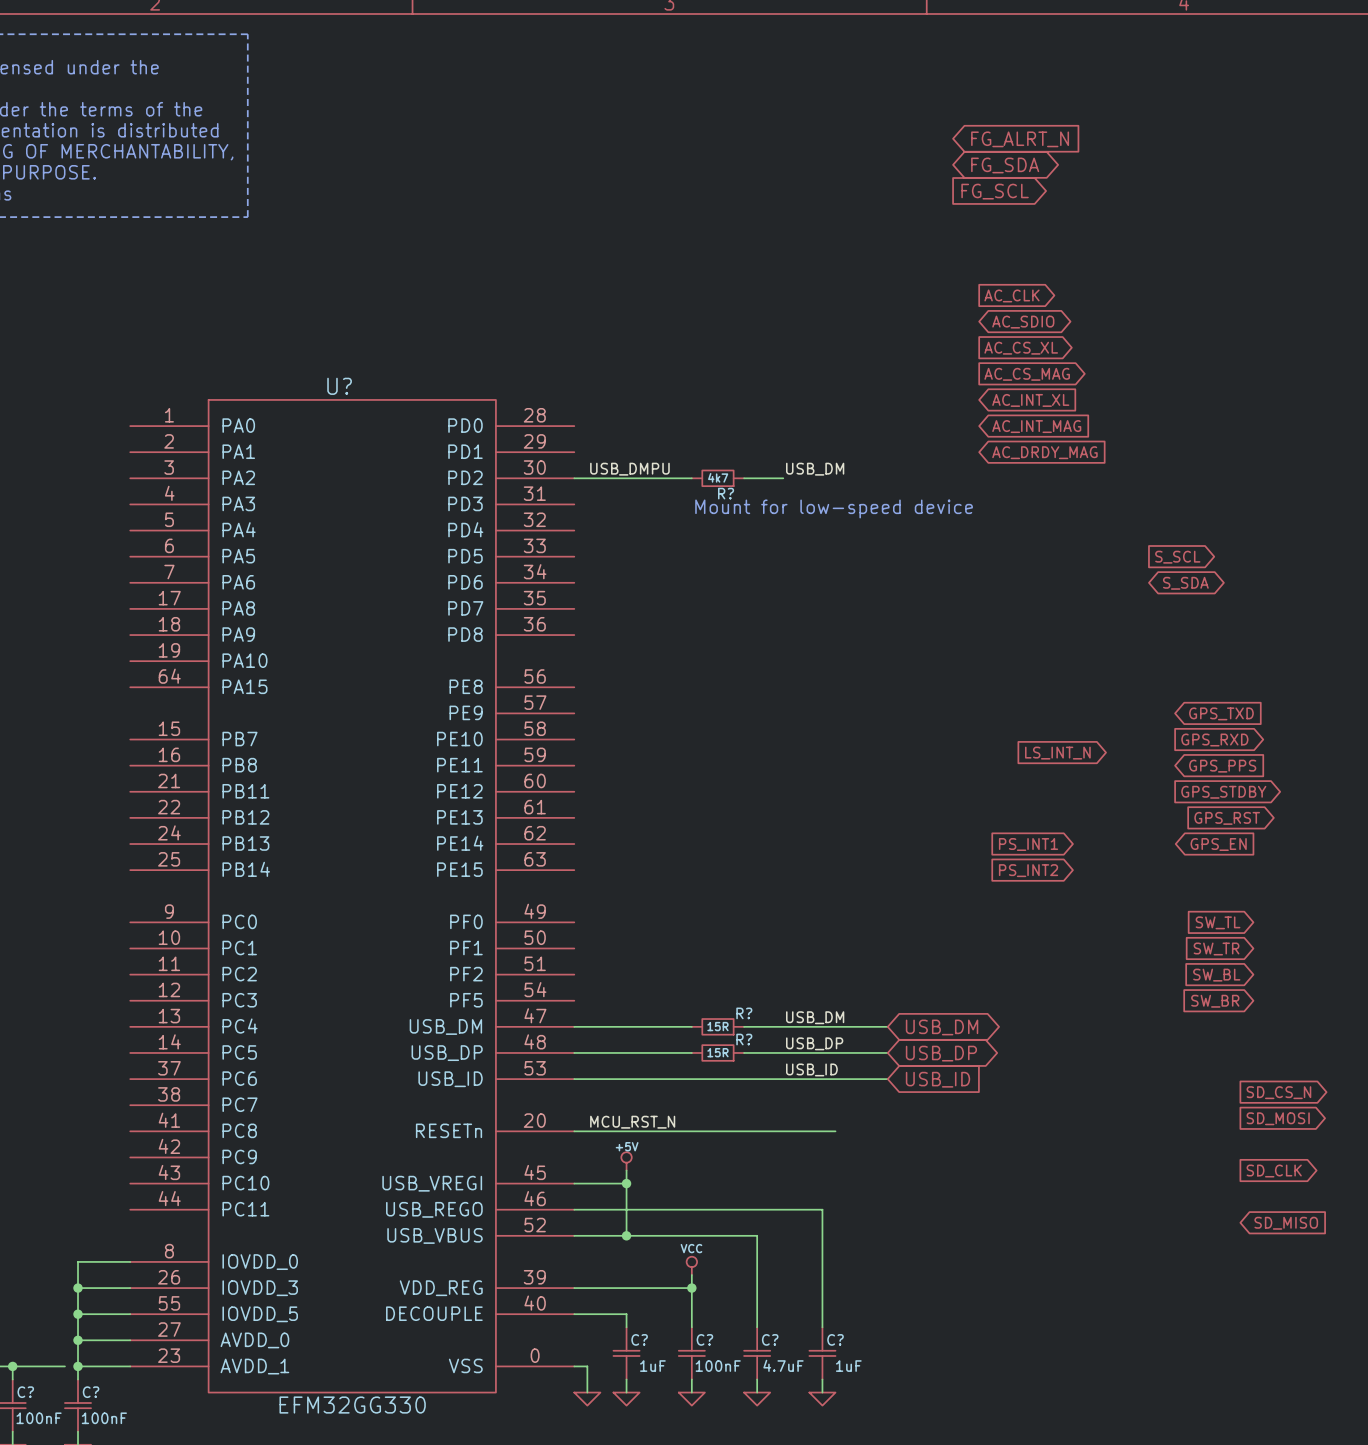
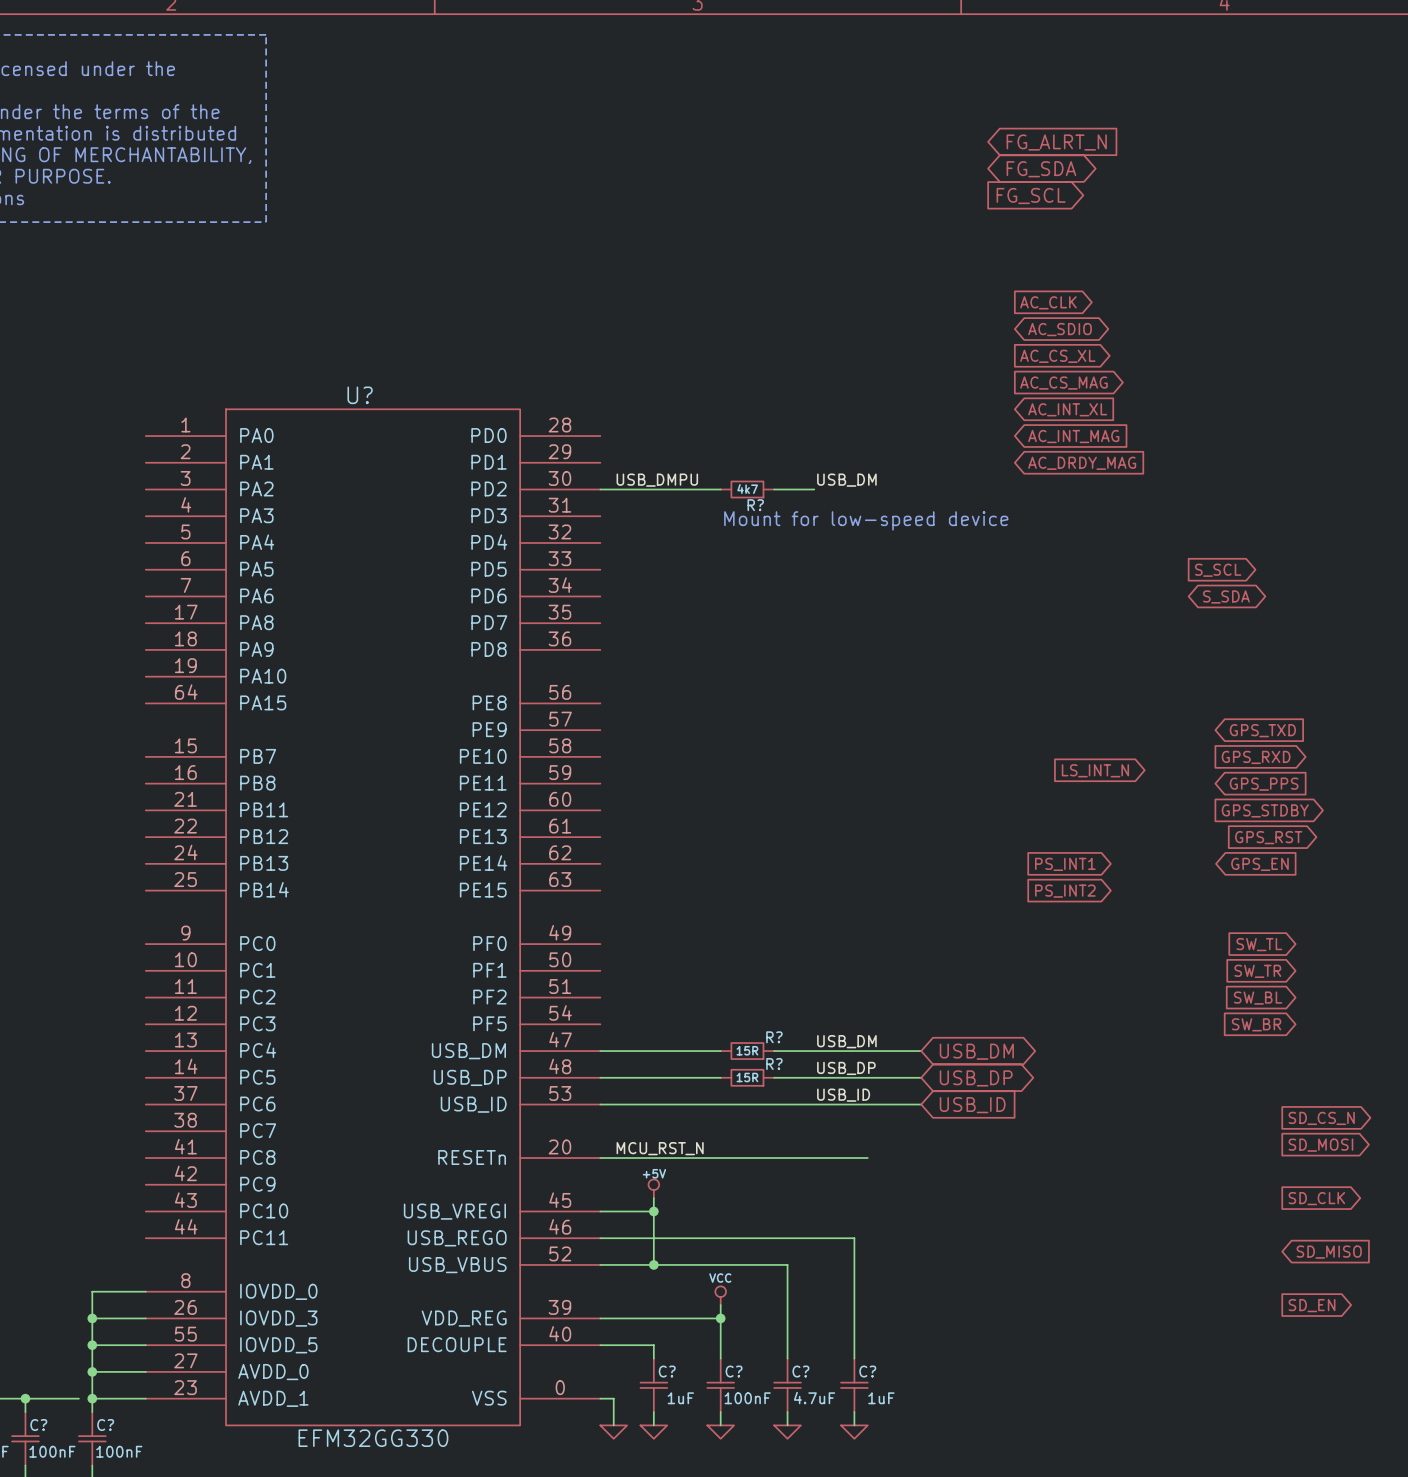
global label: none -> SD_EN (1312, 1305)

